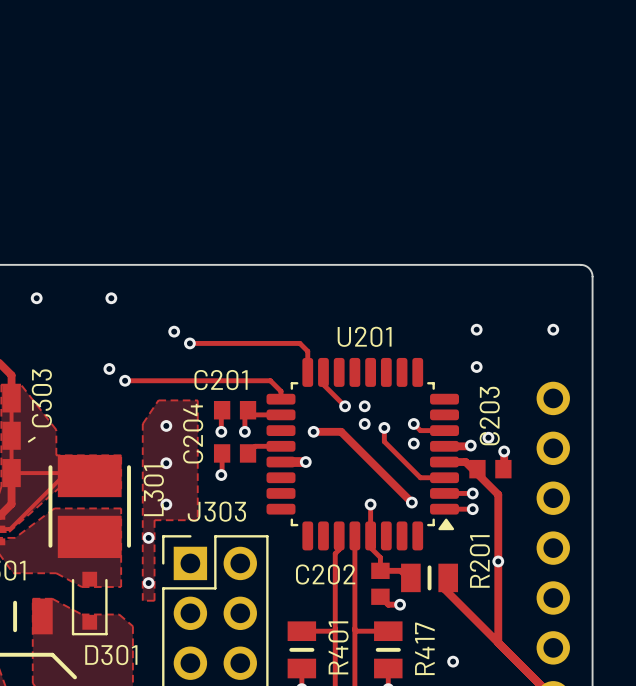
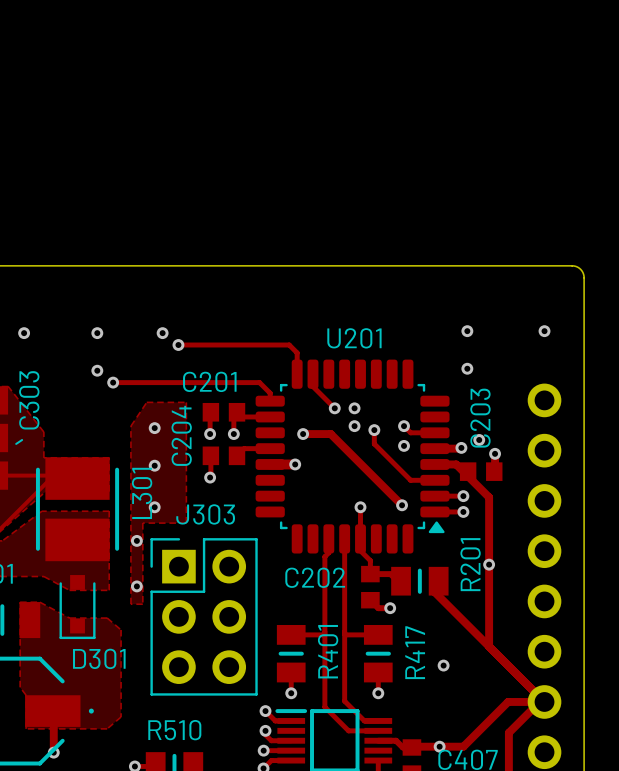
via position: (36, 298) -> (24, 333)
via position: (111, 298) -> (97, 333)

